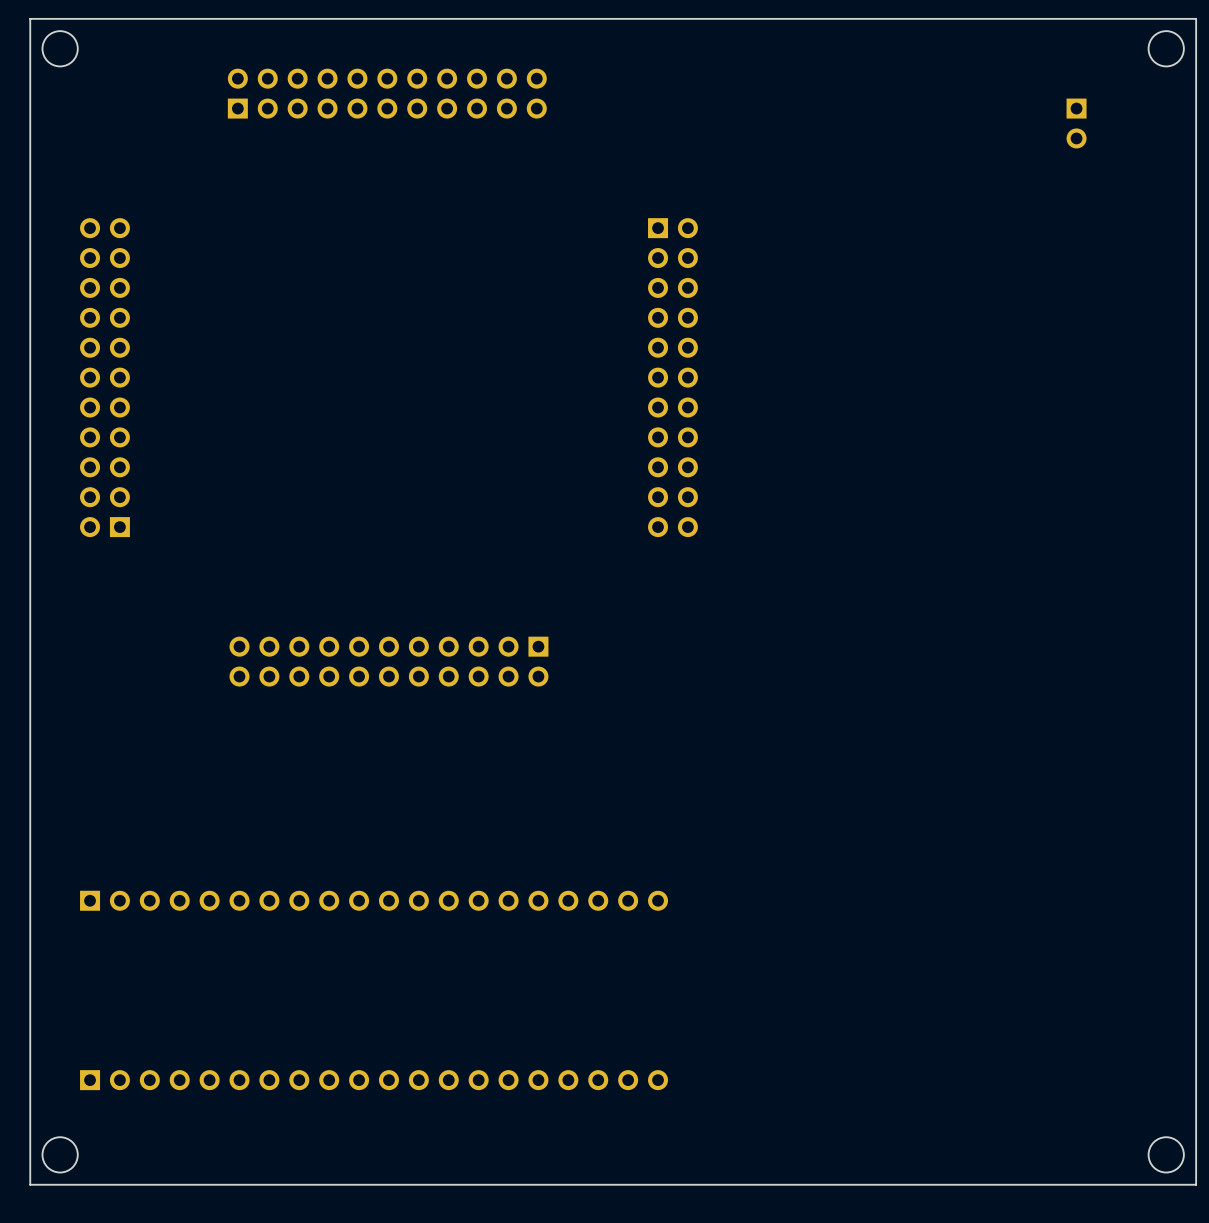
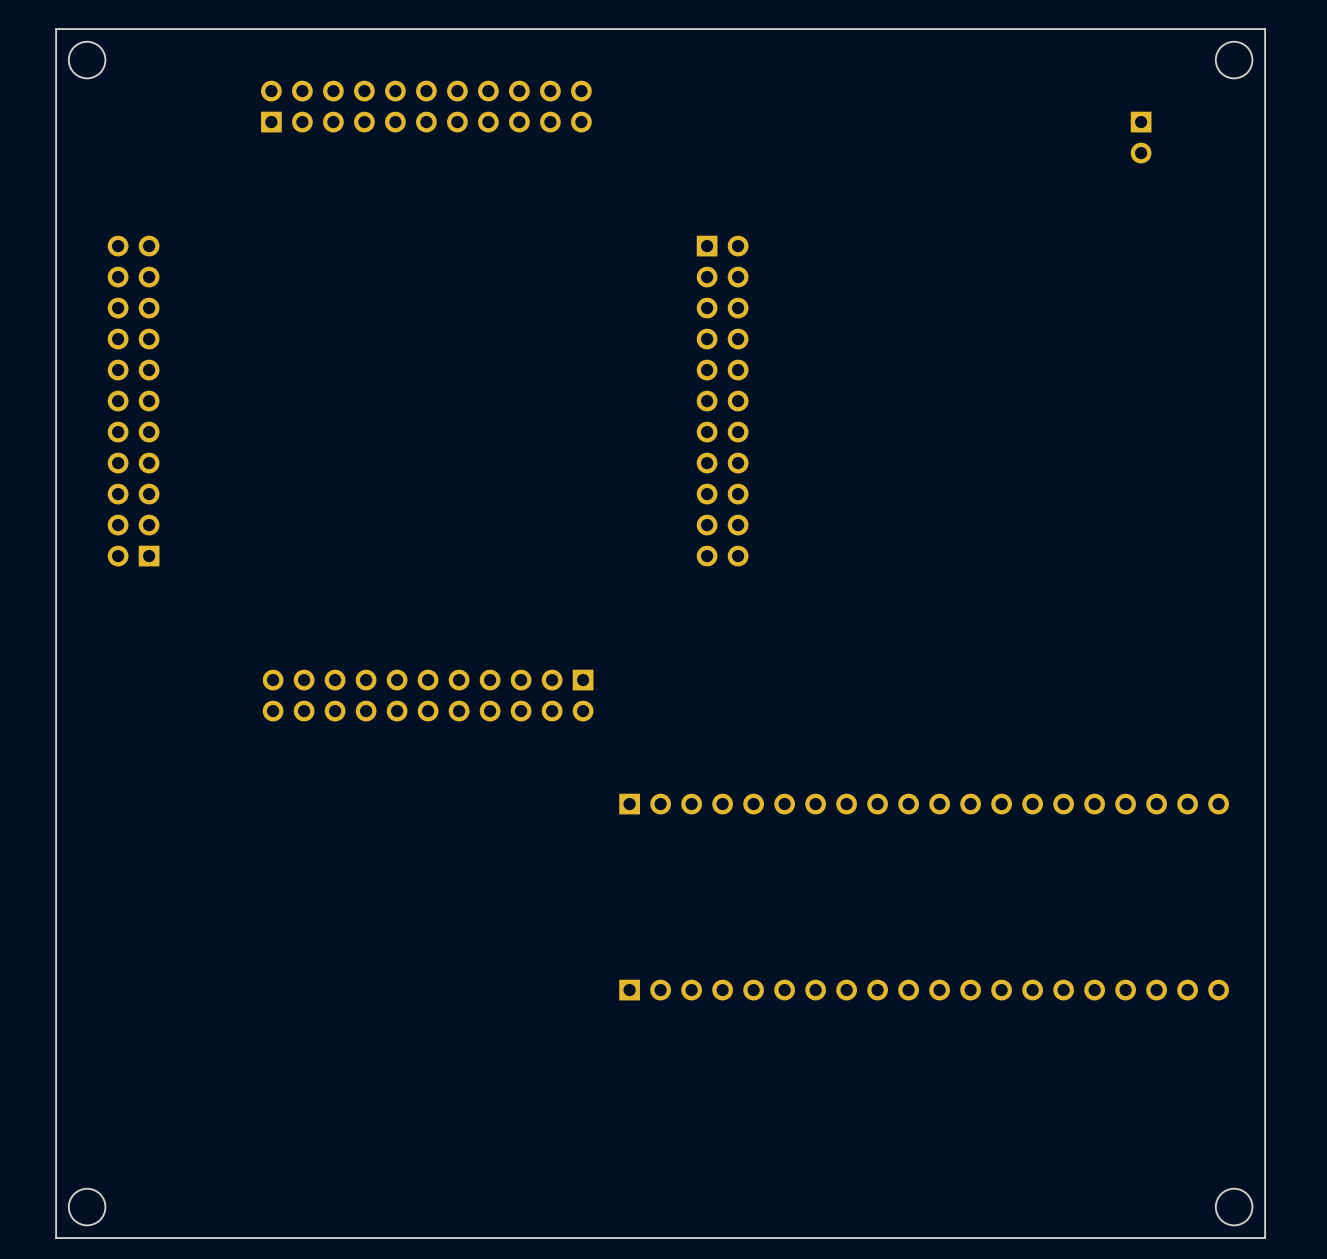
part: none -> (924, 804)
part: (374, 900) -> none
part: none -> (924, 990)
part: (374, 1080) -> none

